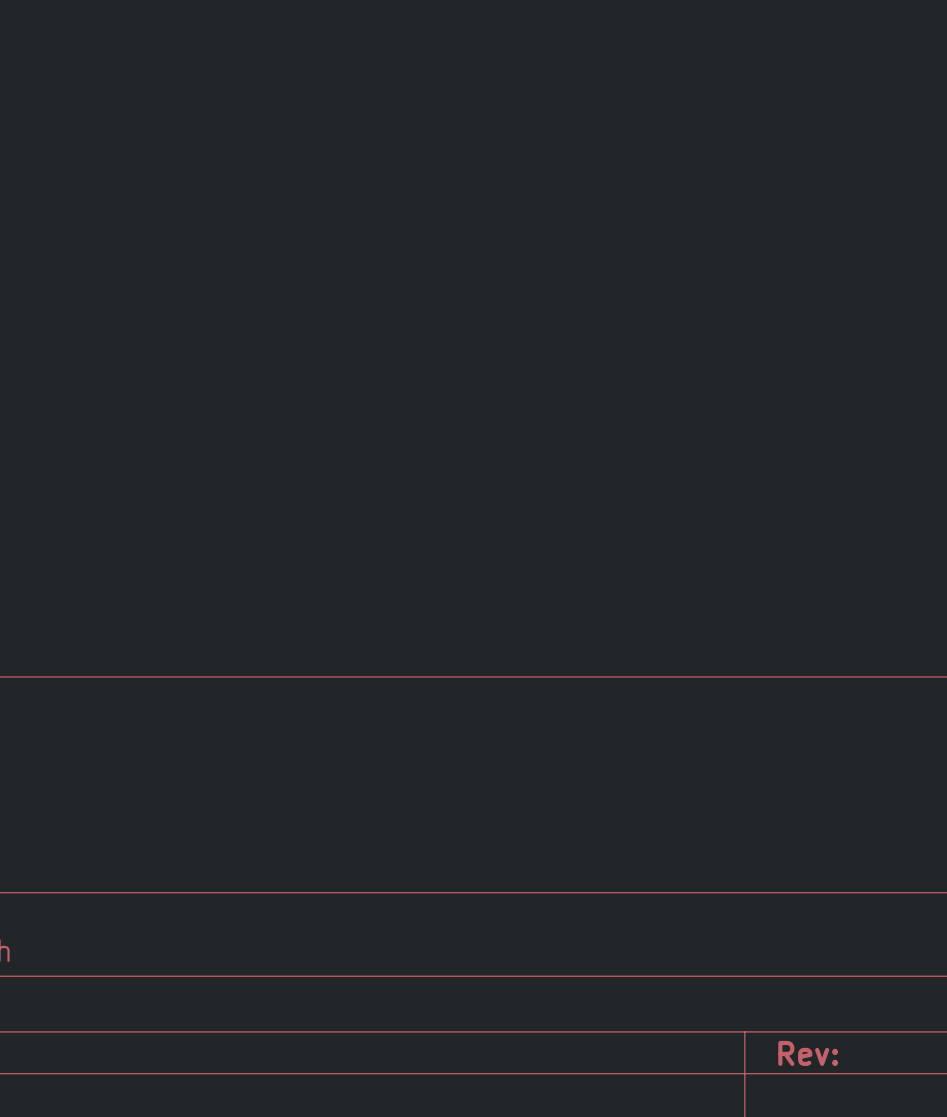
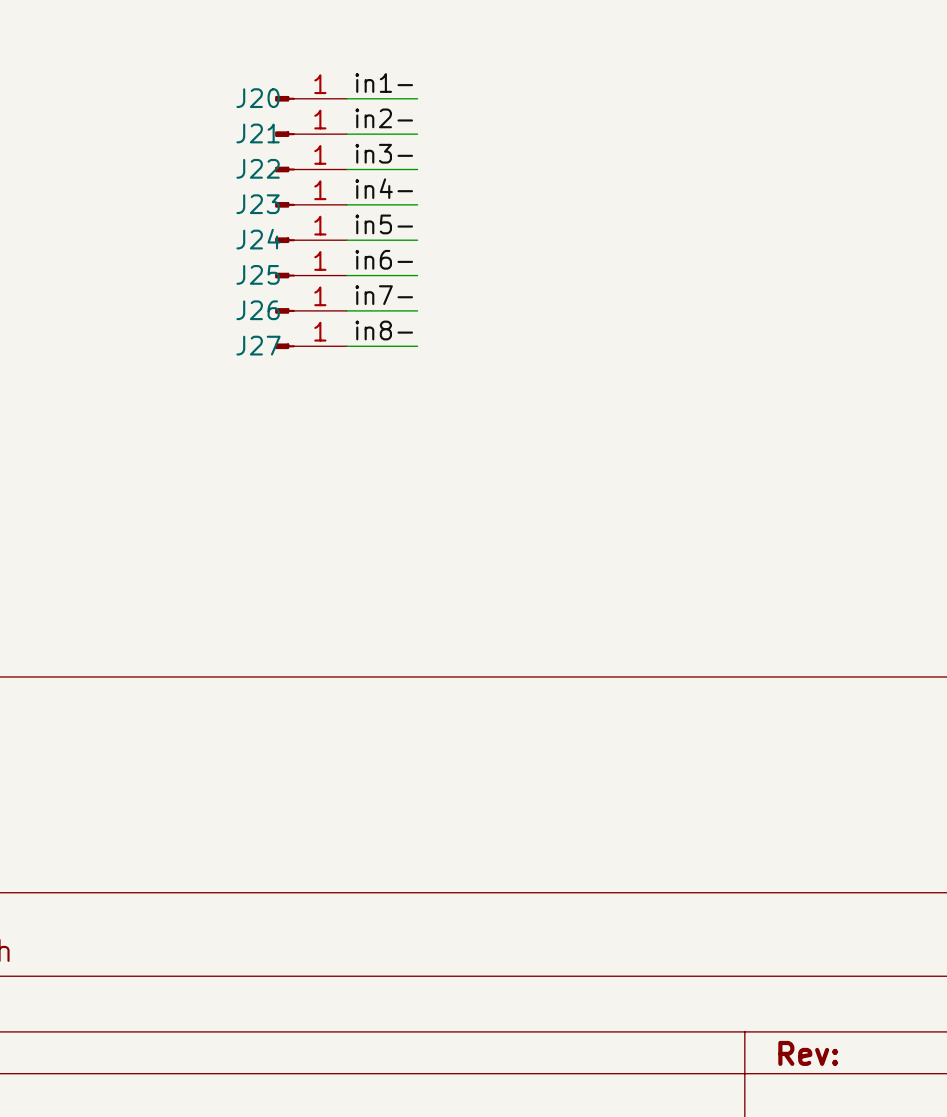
label: none -> in1- (384, 83)
J20: none -> (310, 98)
wire: none -> (346, 98) (417, 98)
label: none -> in2- (384, 118)
J21: none -> (310, 134)
wire: none -> (346, 134) (417, 134)
label: none -> in3- (384, 153)
J22: none -> (310, 169)
wire: none -> (346, 169) (417, 169)
label: none -> in4- (384, 188)
J23: none -> (310, 204)
wire: none -> (346, 204) (417, 204)
label: none -> in5- (384, 224)
J24: none -> (310, 240)
wire: none -> (346, 240) (417, 240)
label: none -> in6- (384, 259)
J25: none -> (310, 275)
wire: none -> (346, 275) (417, 275)
label: none -> in7- (384, 295)
J26: none -> (310, 310)
wire: none -> (346, 310) (417, 310)
label: none -> in8- (384, 330)
J27: none -> (310, 346)
wire: none -> (346, 346) (417, 346)

